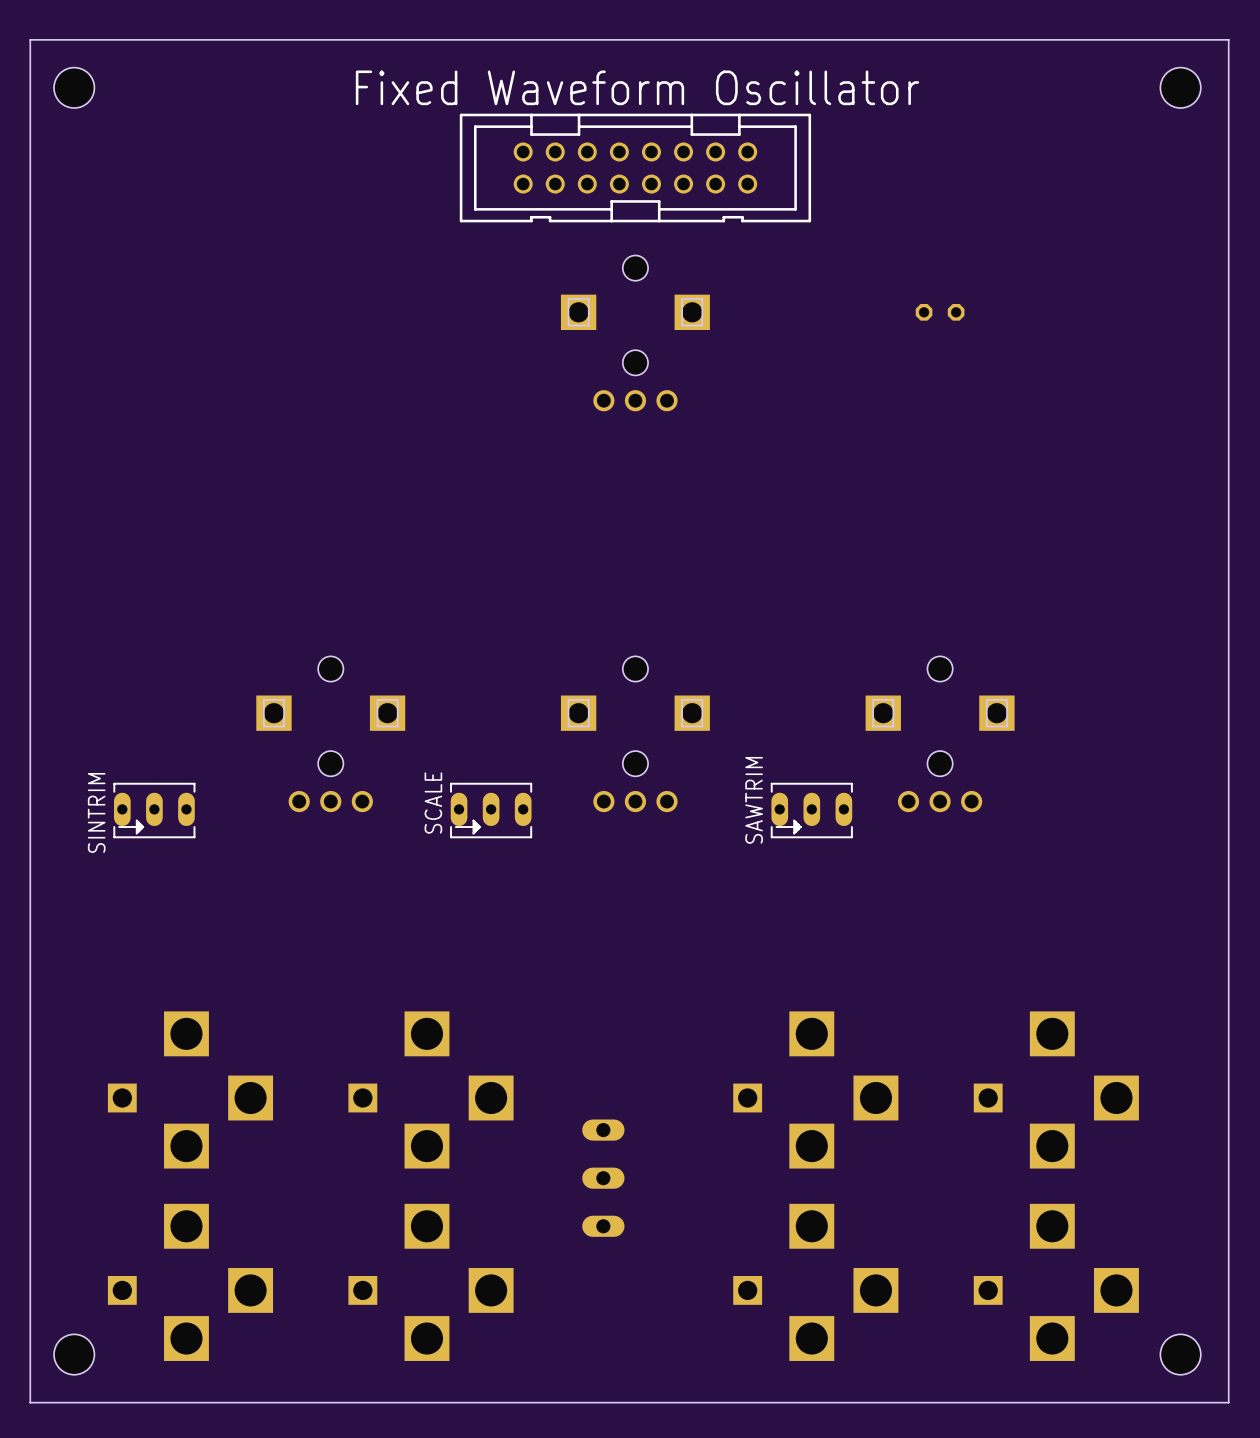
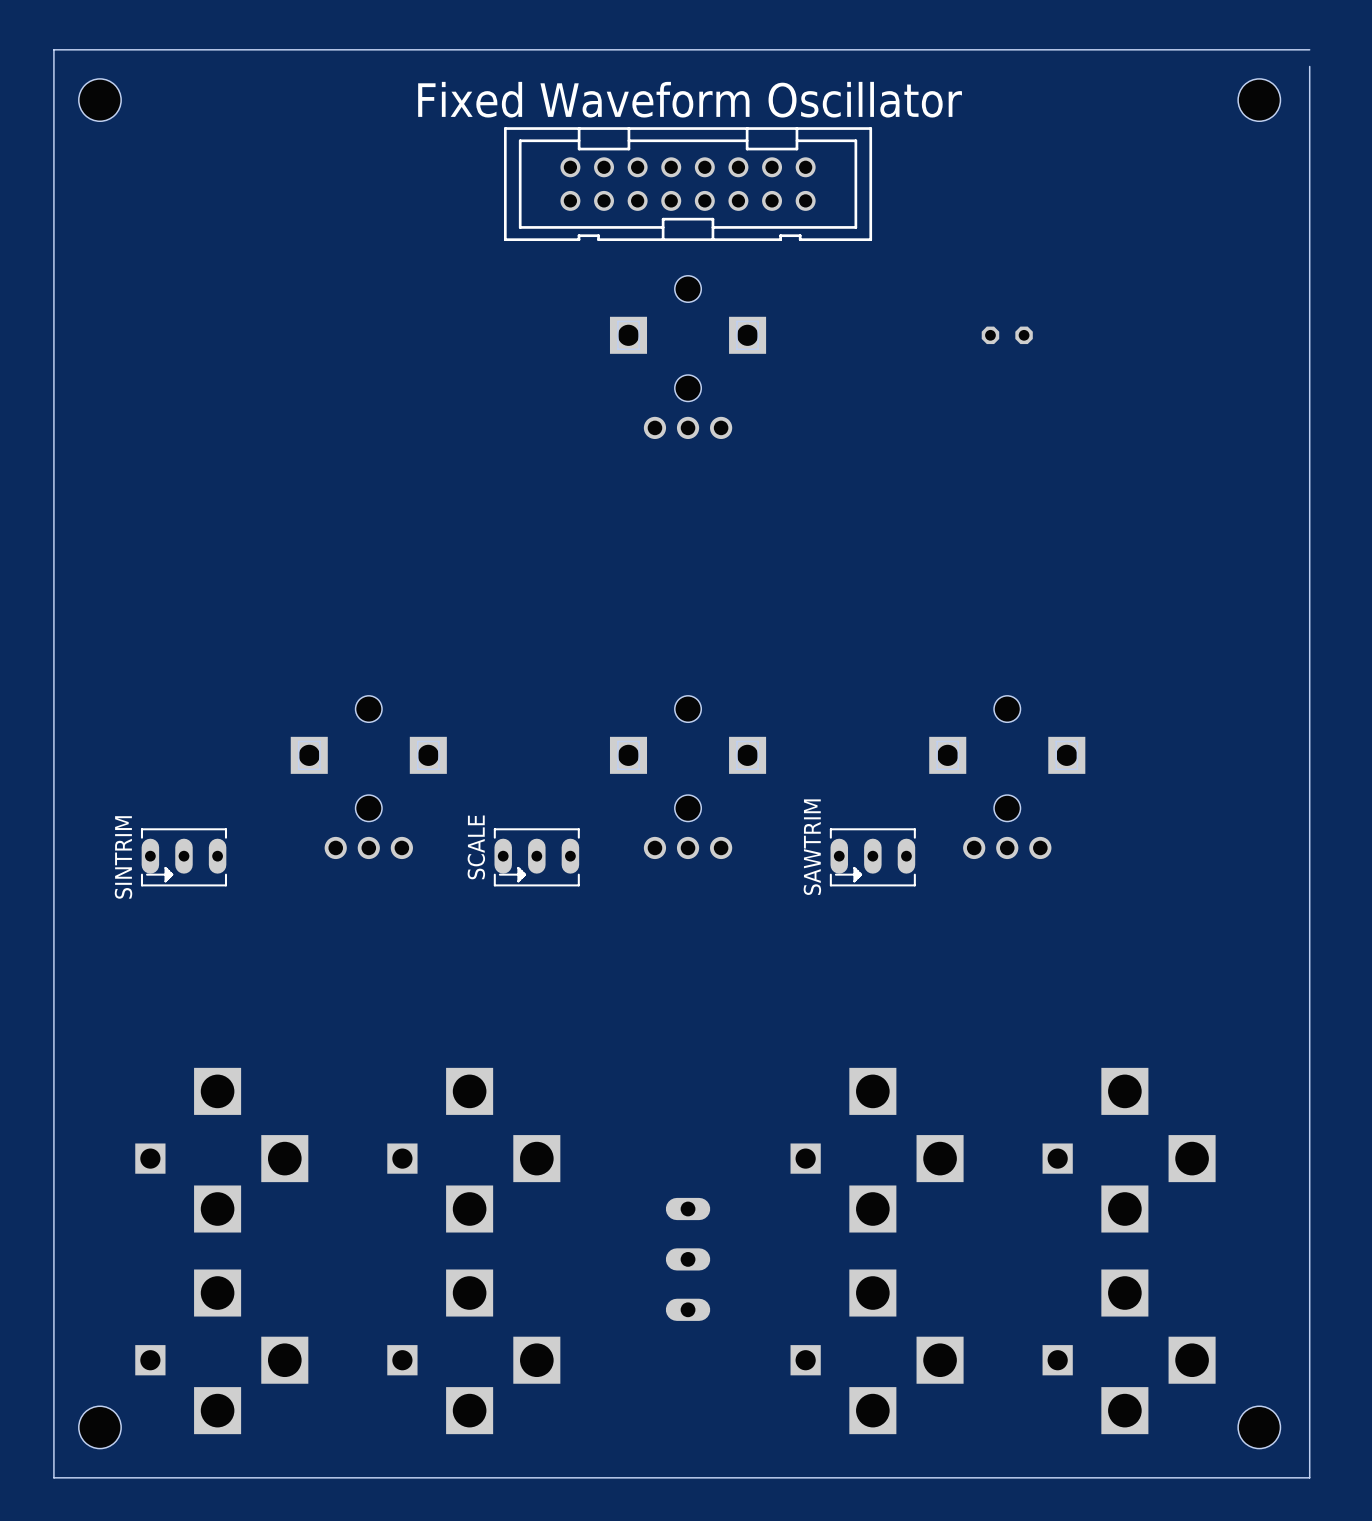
board edge: (1228, 39) (1228, 55) -> none
part position: (603, 1178) -> (688, 1259)

